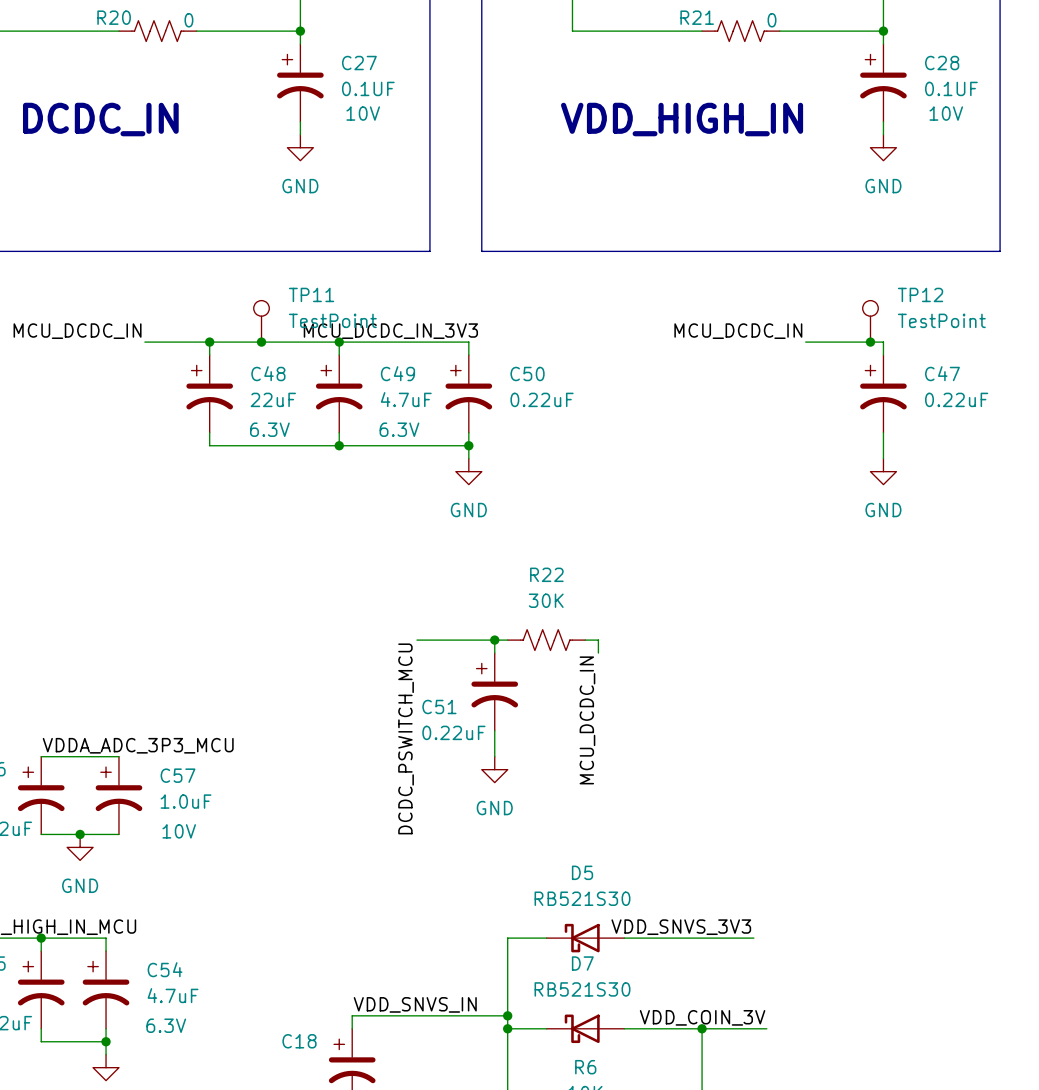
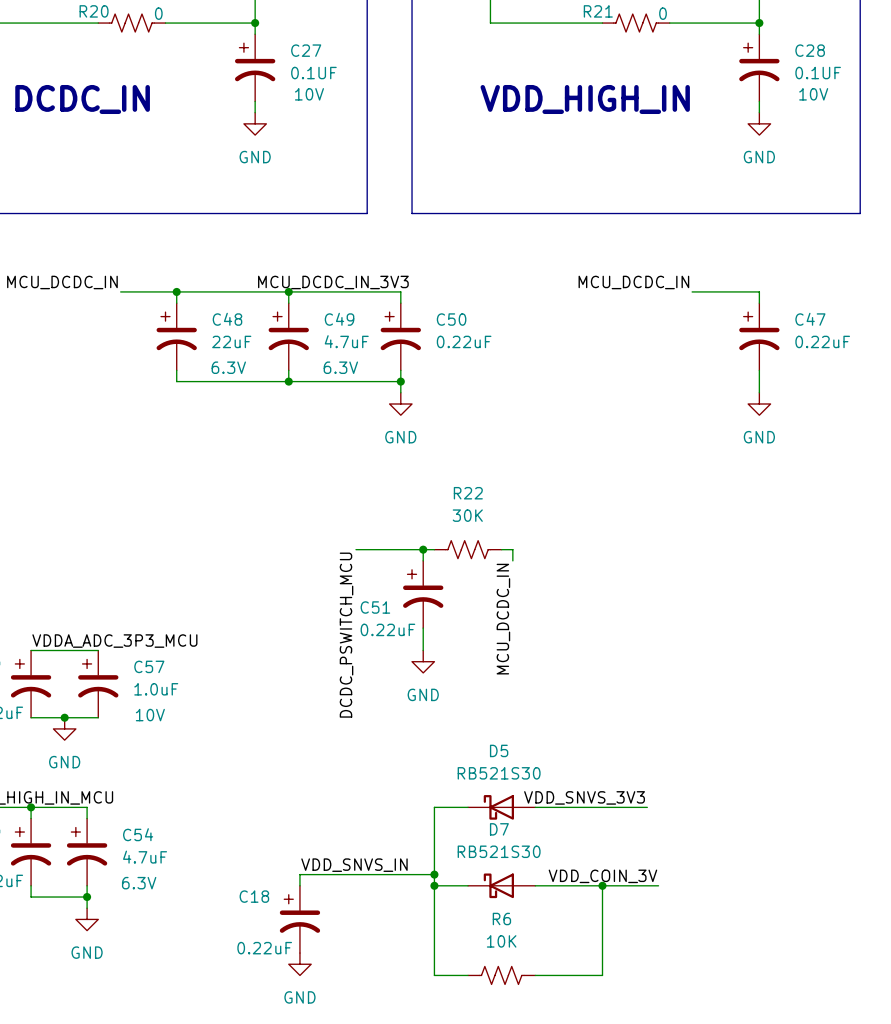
TP11: TestPoint (261, 321) -> none
TP12: TestPoint (870, 321) -> none
junction: (261, 342) -> none
junction: (870, 342) -> none

